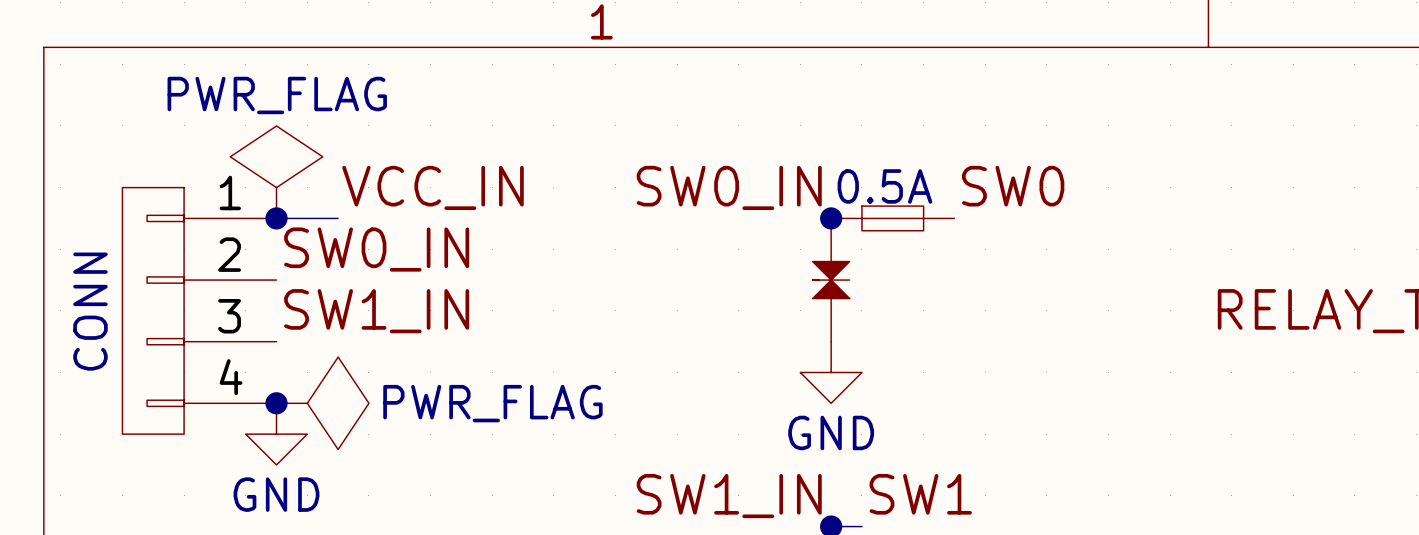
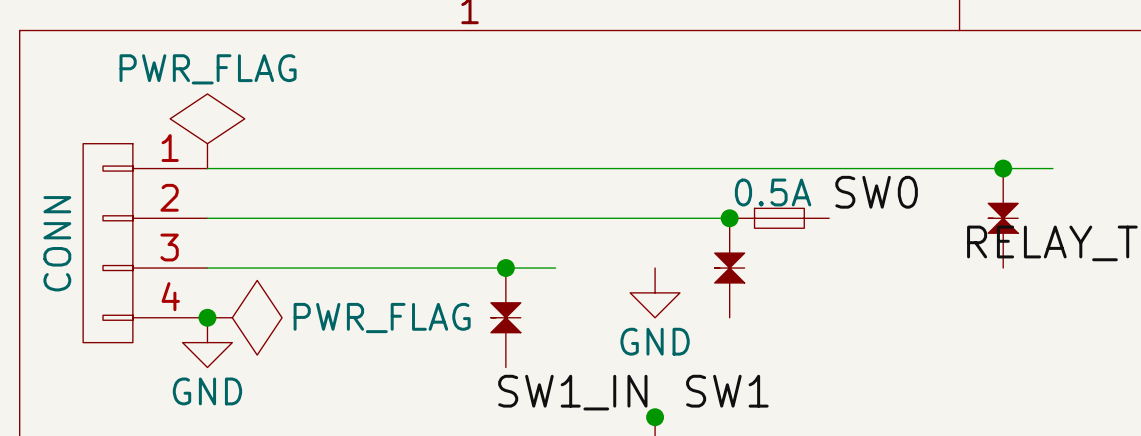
label position: SW0 (1013, 186) -> SW0 (876, 192)
label: VCC_IN (433, 187) -> none
label: SW0_IN (729, 187) -> none
junction: (276, 218) -> none
wire: none -> (257, 168) (1052, 168)
junction: (831, 218) -> none
part position: (892, 218) -> (779, 218)
junction: none -> (1003, 168)
label: SW0_IN (376, 249) -> none
wire: none -> (207, 218) (729, 218)
part: (831, 280) -> none
junction: none -> (729, 218)
part: none -> (1003, 218)
label: SW1_IN (376, 311) -> none
wire: none -> (207, 268) (555, 268)
junction: none -> (505, 268)
part: none -> (729, 268)
part: none -> (505, 317)
wire: (831, 526) (861, 526) -> none

